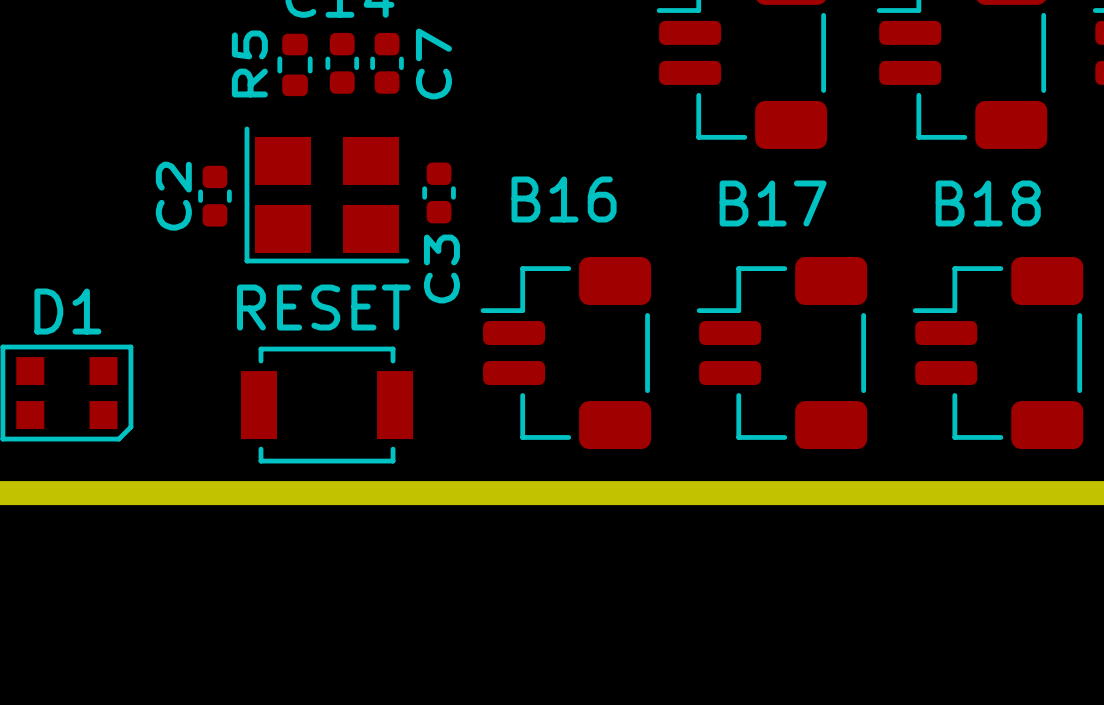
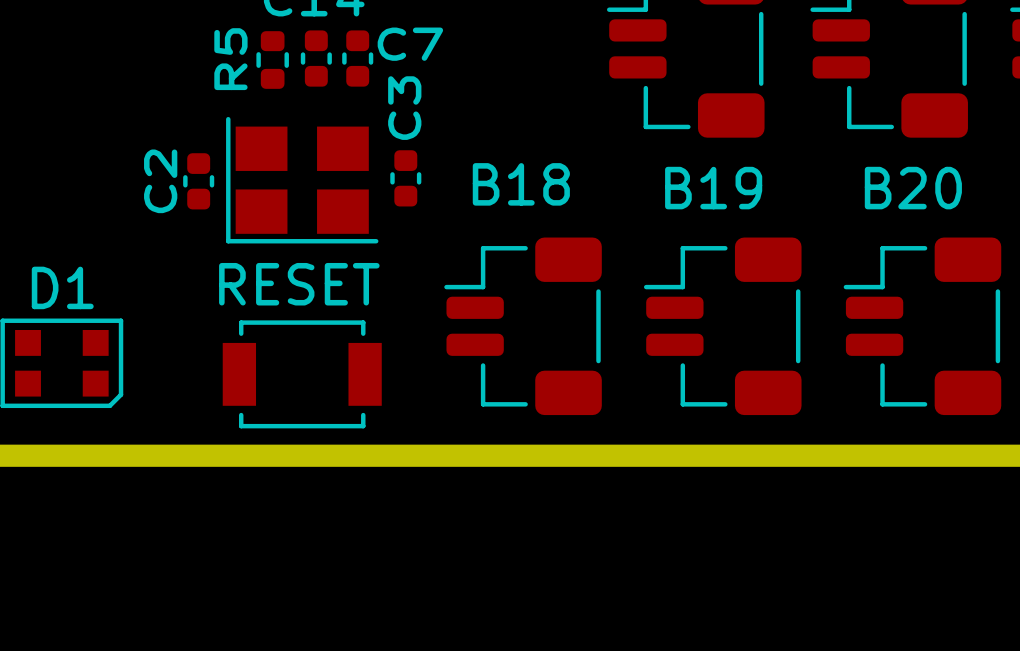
C7 name rotation: 0° (433, 63) -> 90° clockwise (410, 44)
part value: B16 (564, 199) -> B18 (521, 184)
part value: B17 (773, 203) -> B19 (713, 188)
part value: B18 (988, 203) -> B20 (913, 188)
C3 name position: C3 (441, 269) -> C3 (404, 108)

